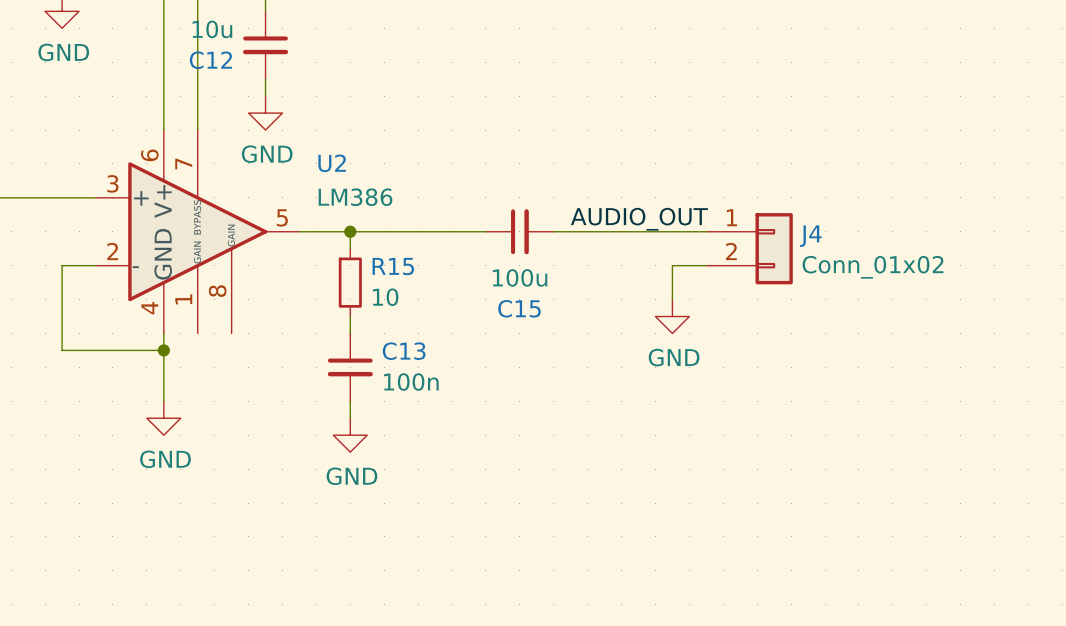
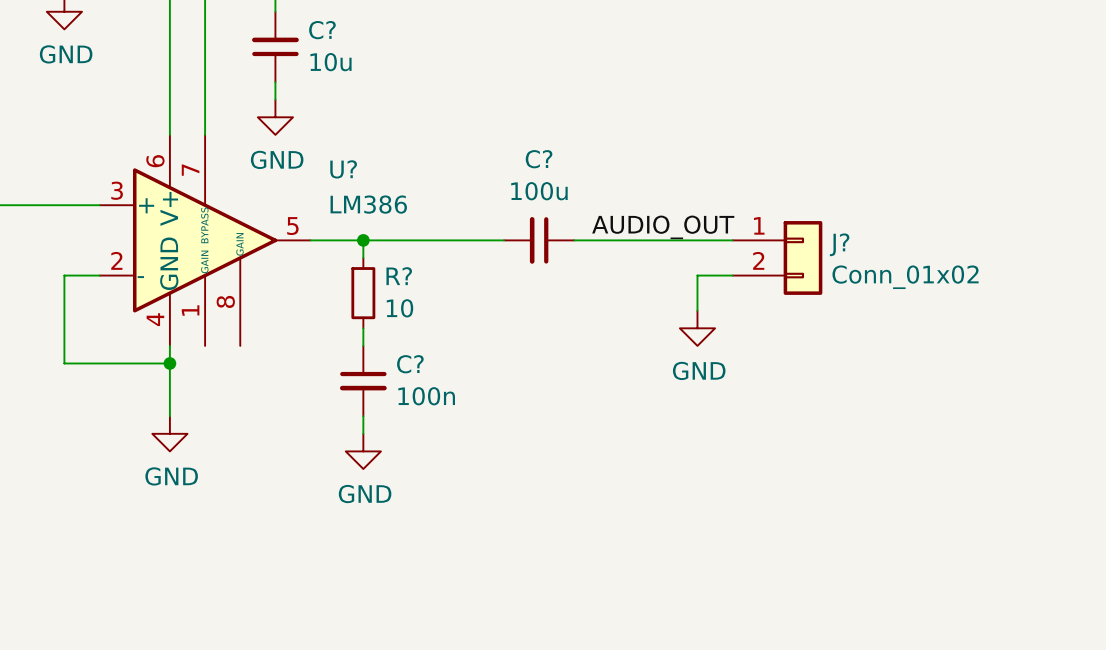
C12: 10u (265, 45) -> none
C?: none -> 10u (275, 46)
U2 name: U2 (332, 163) -> U? (343, 169)
C15: 100u (519, 231) -> none
C?: none -> 100u (539, 240)
J4 name: J4 (810, 236) -> J? (839, 244)
R15 name: R15 (393, 266) -> R? (399, 276)
C13 name: C13 (404, 351) -> C? (410, 364)

